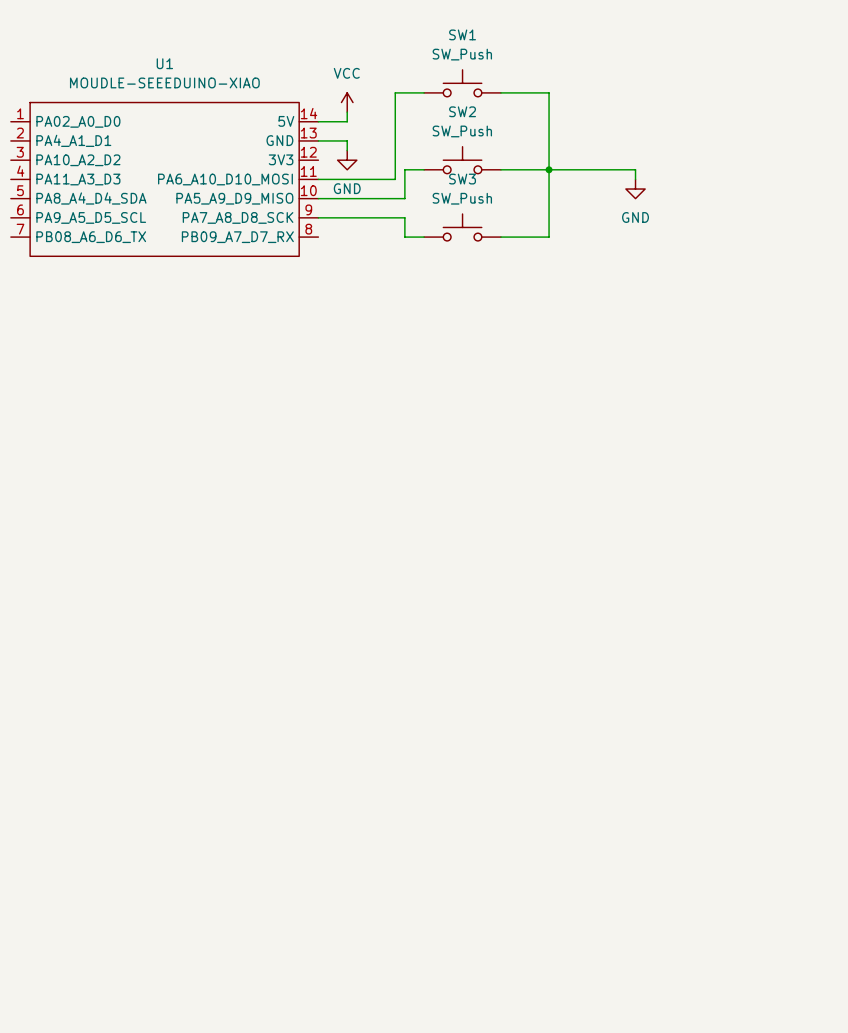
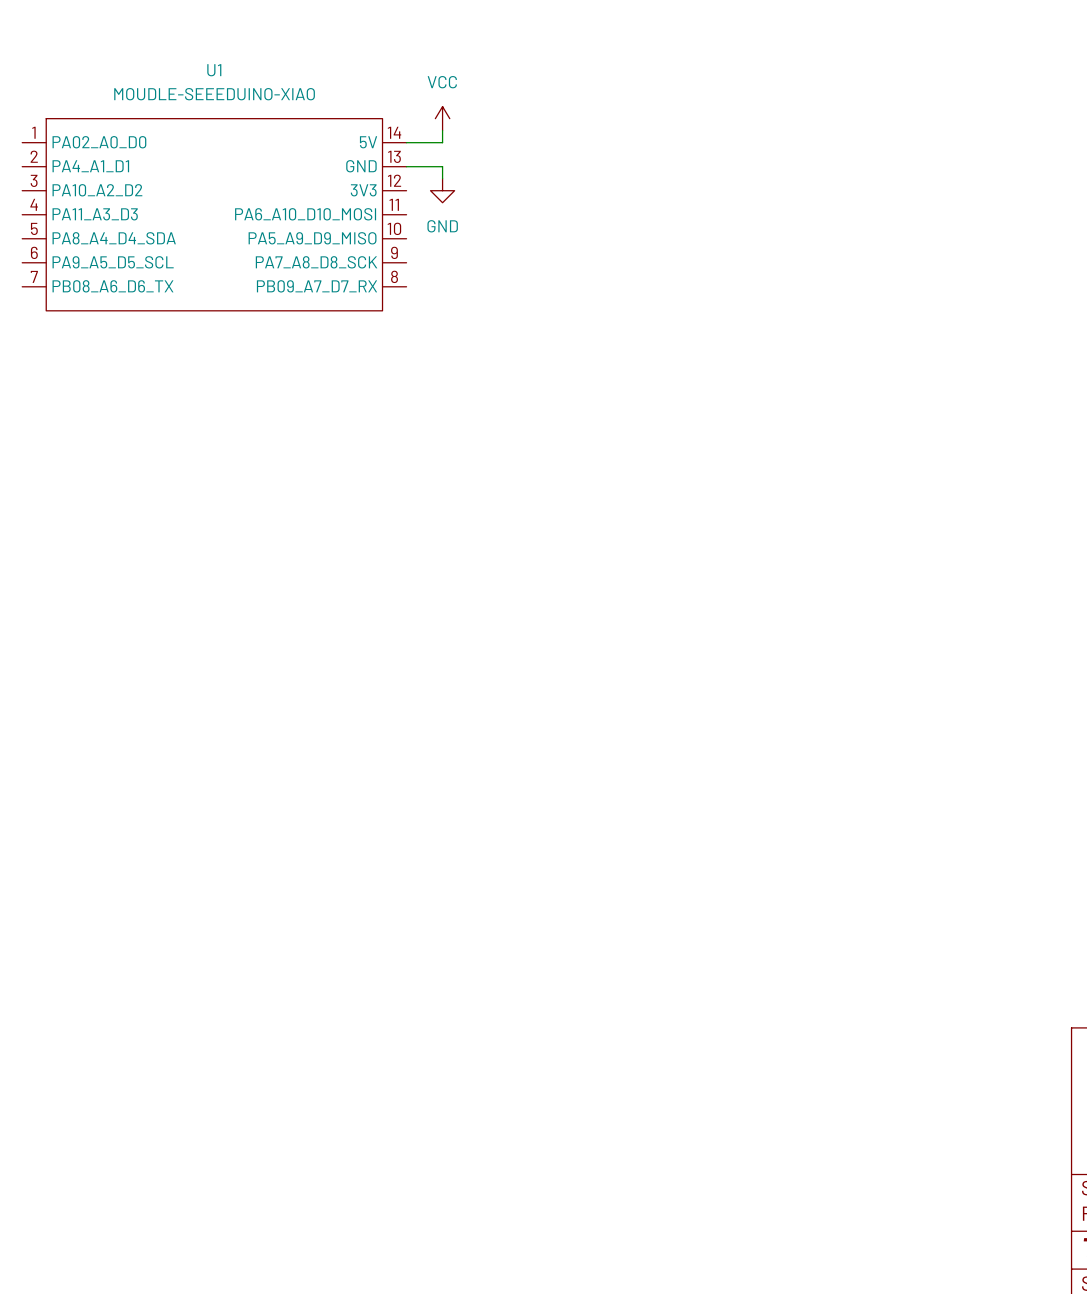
SW1: SW_Push (462, 83) -> none
wire: (424, 92) (395, 92) (395, 179) (318, 179) -> none
wire: (500, 92) (549, 92) (549, 237) (500, 237) -> none
SW2: SW_Push (462, 160) -> none
wire: (424, 169) (404, 169) (404, 198) (318, 198) -> none
wire: (500, 169) (635, 169) (635, 179) -> none
junction: (549, 169) -> none
power symbol: GND (635, 189) -> none
wire: (318, 217) (404, 217) (404, 237) (424, 237) -> none
SW3: SW_Push (462, 227) -> none

